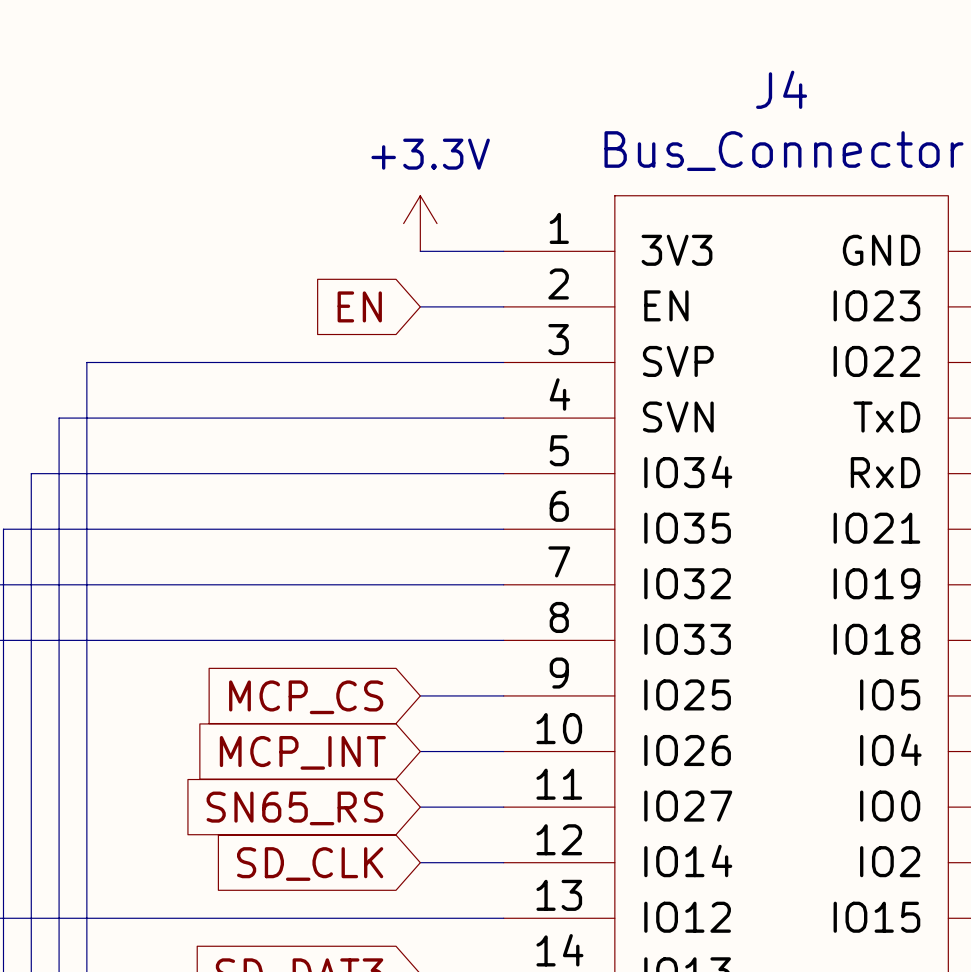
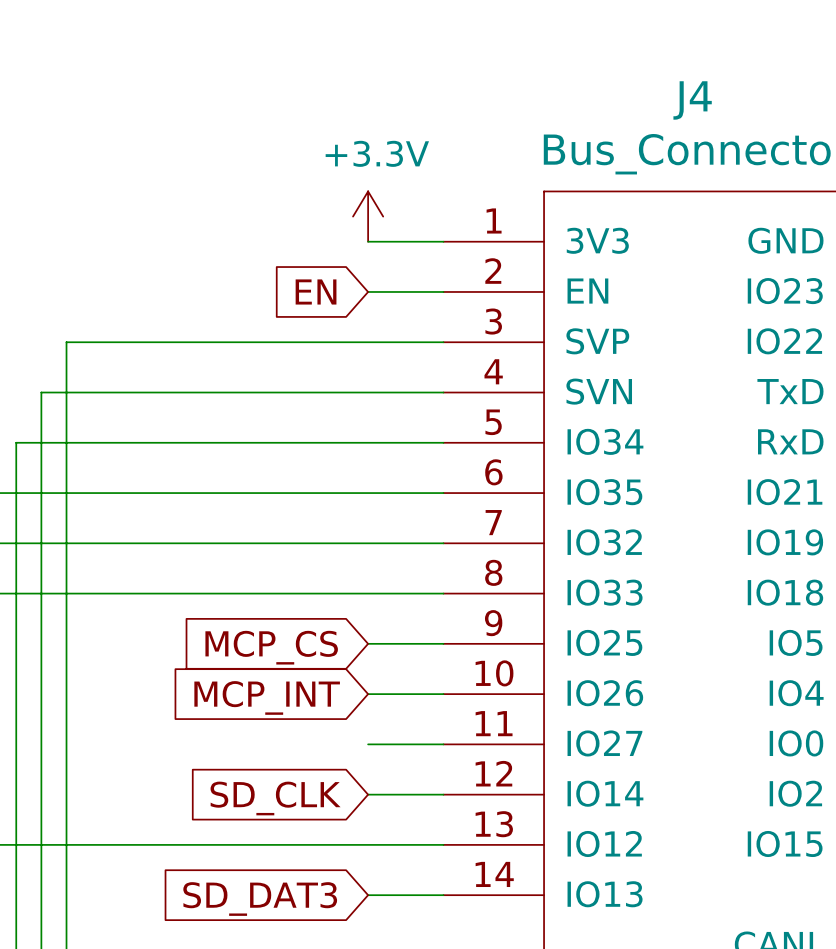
global label: SN65_RS (294, 808) -> none

